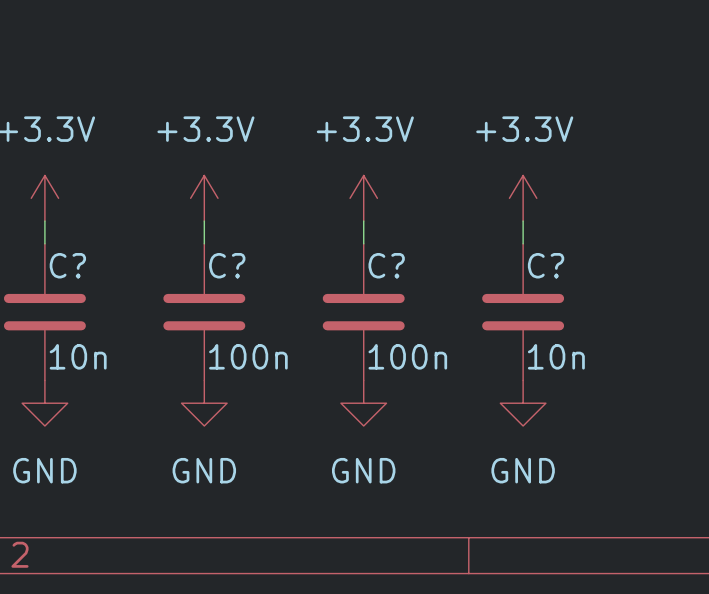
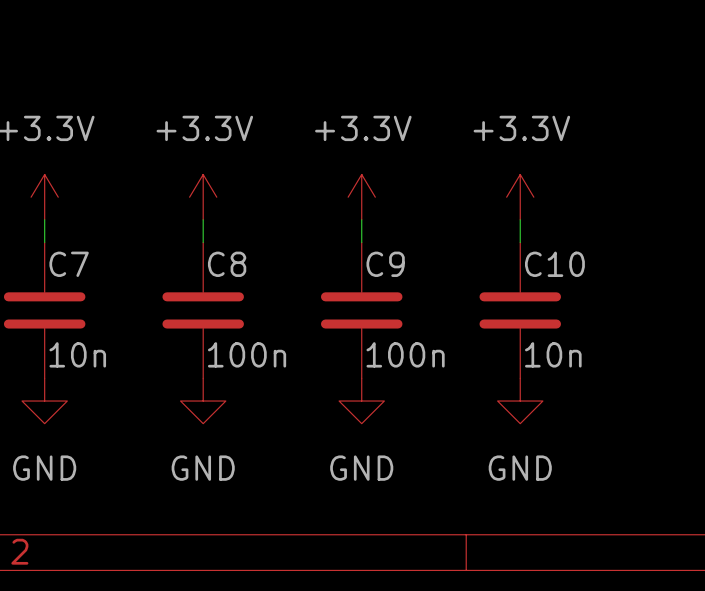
C? name: C? (67, 265) -> C7 (69, 264)
C? name: C? (227, 265) -> C8 (227, 264)
C? name: C? (386, 265) -> C9 (385, 264)
C? name: C? (546, 265) -> C10 (554, 264)

